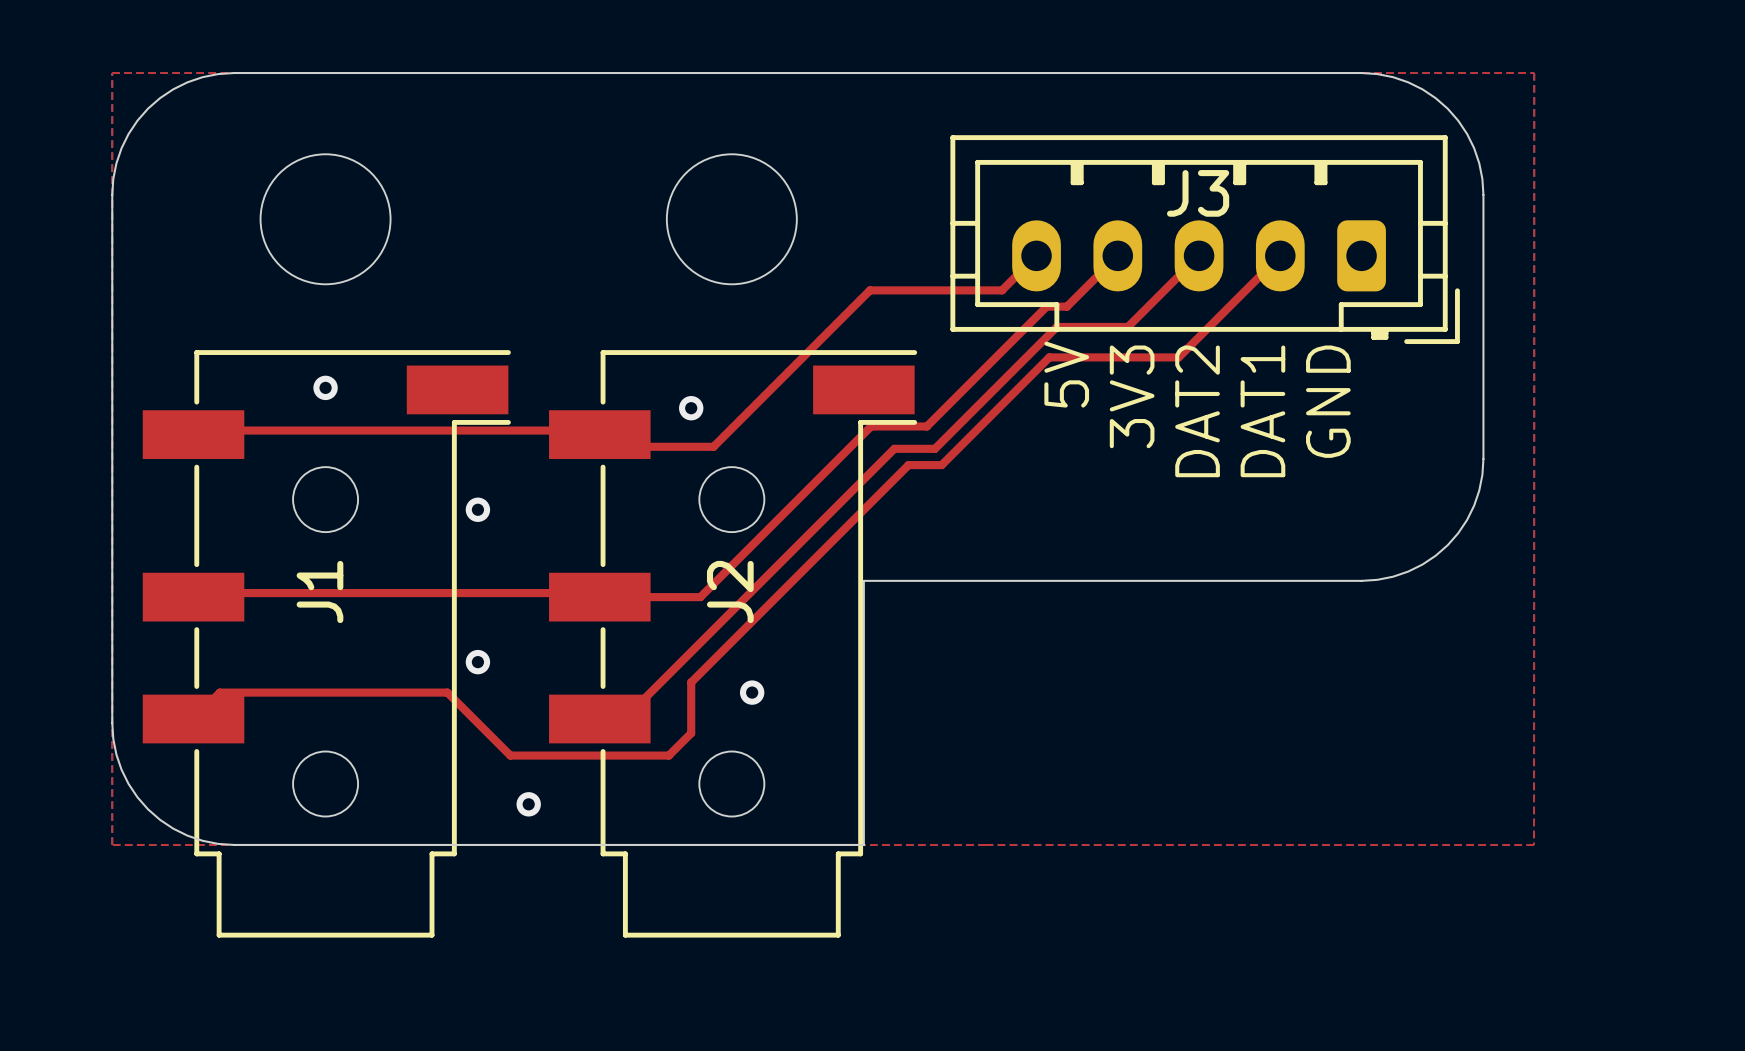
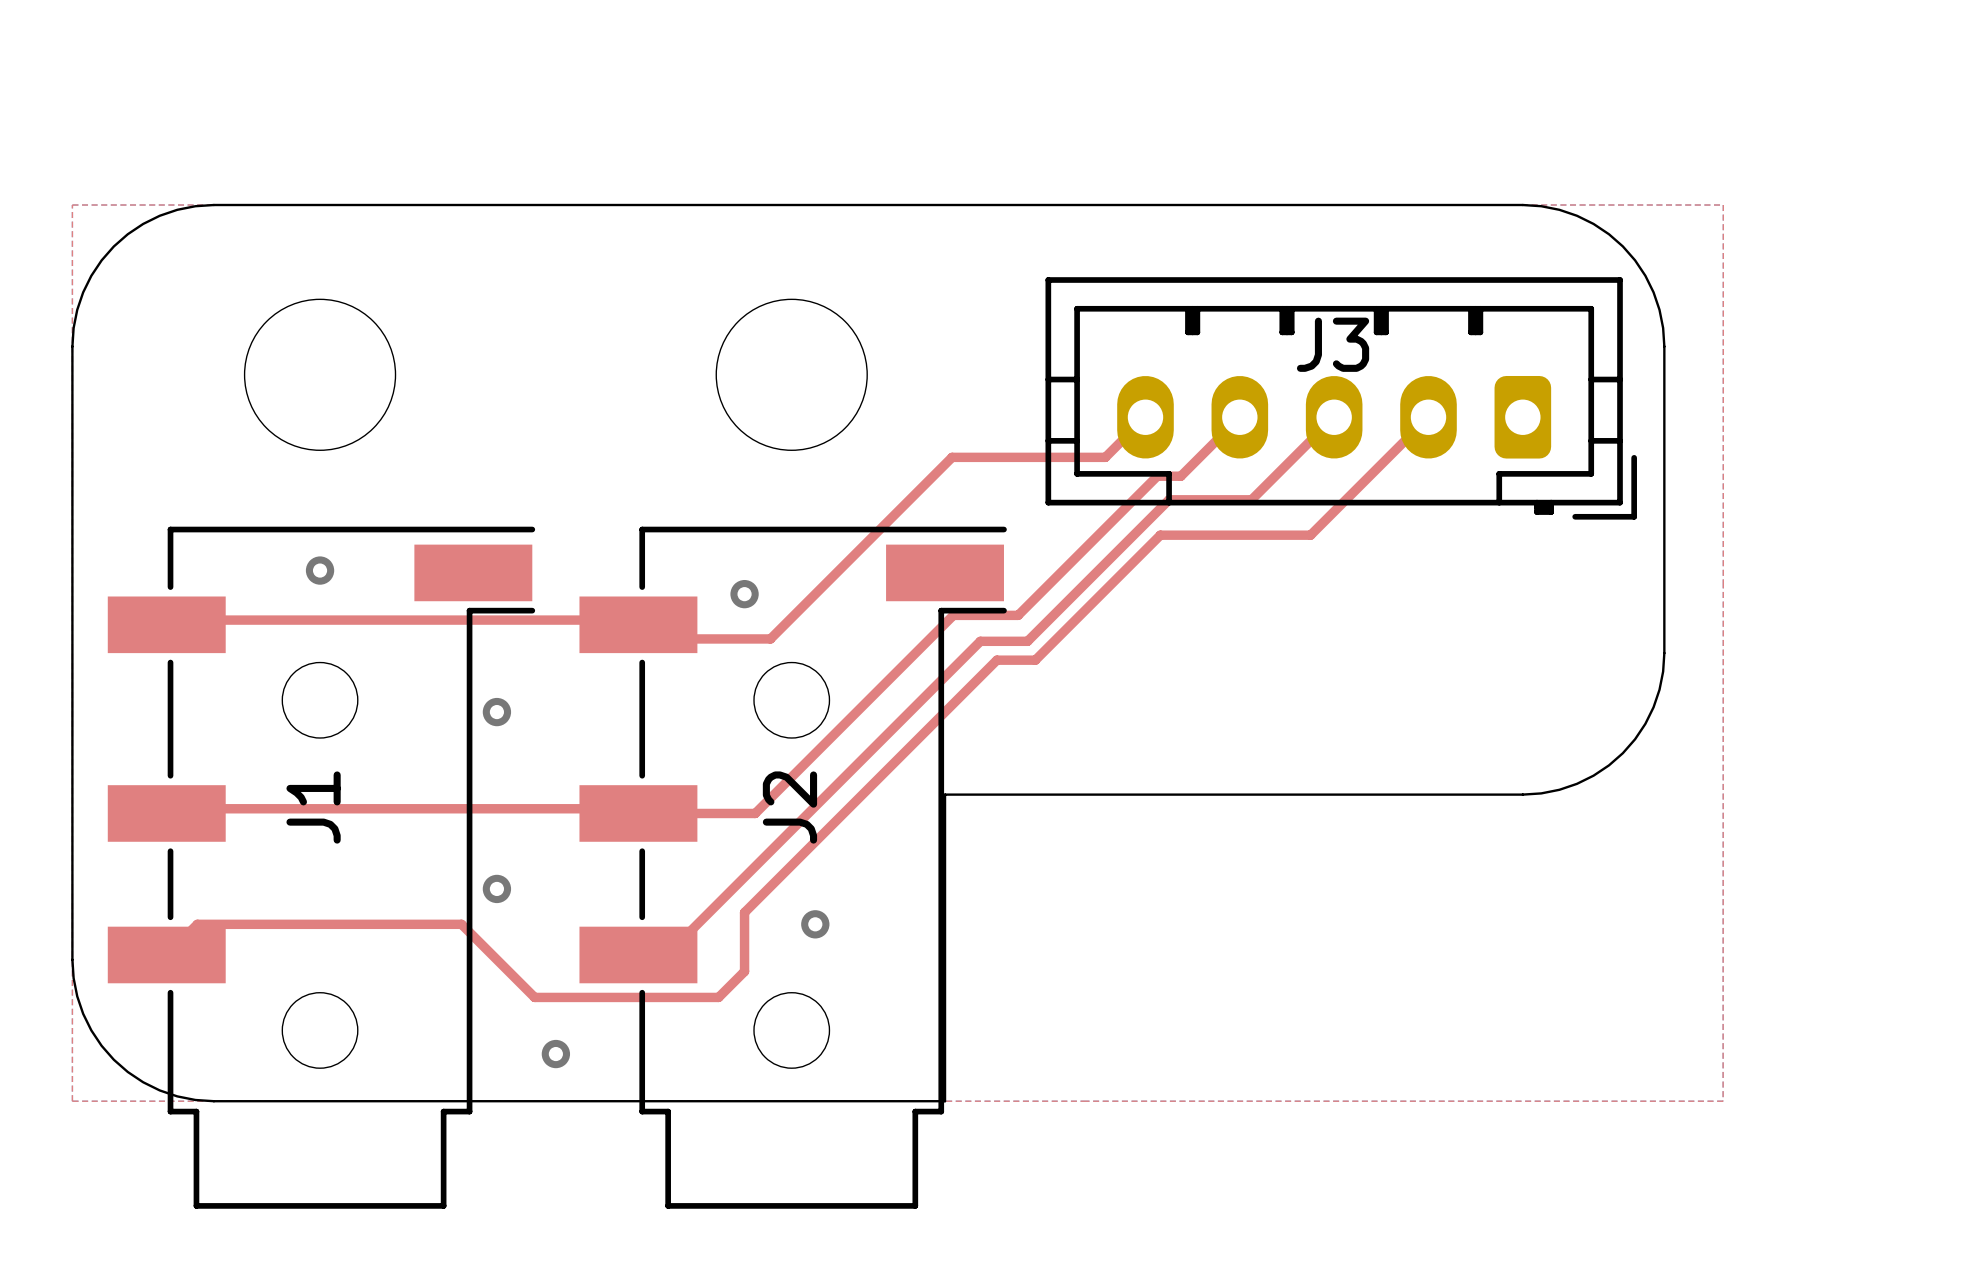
text: 5V (1066, 374) -> none
text: 3V3 (1132, 396) -> none
text: GND (1328, 401) -> none
text: DAT2 (1197, 411) -> none
text: DAT1 (1262, 411) -> none

